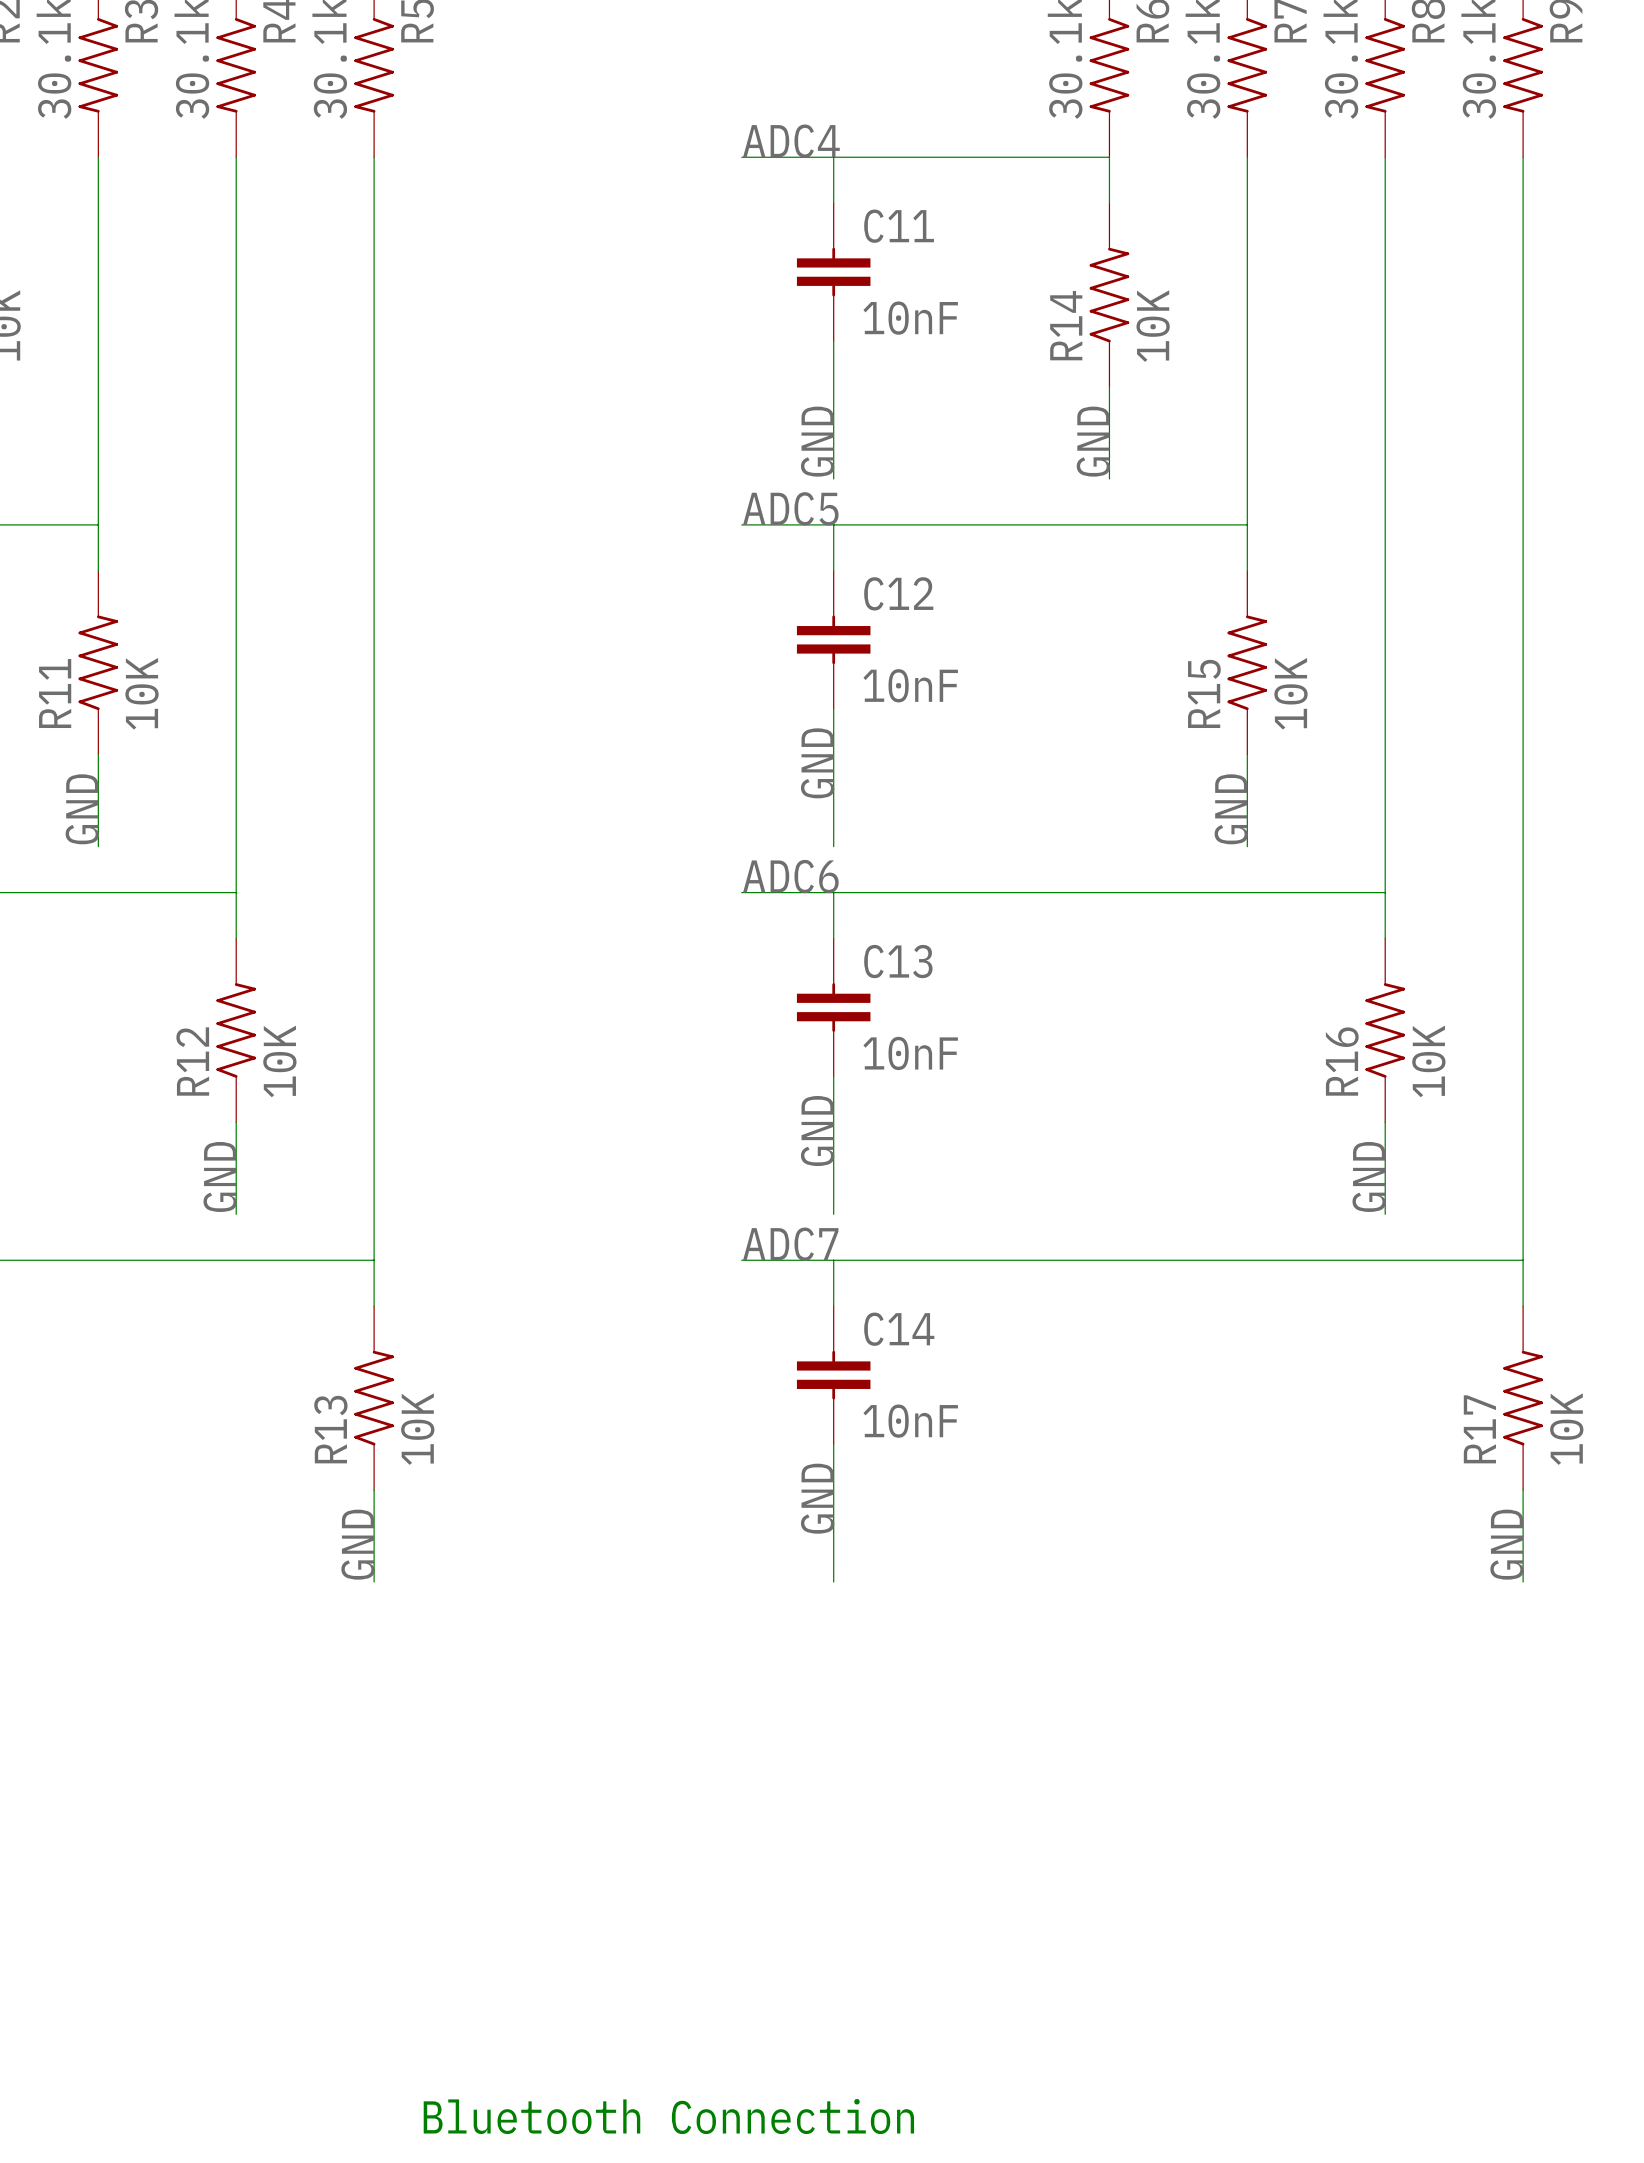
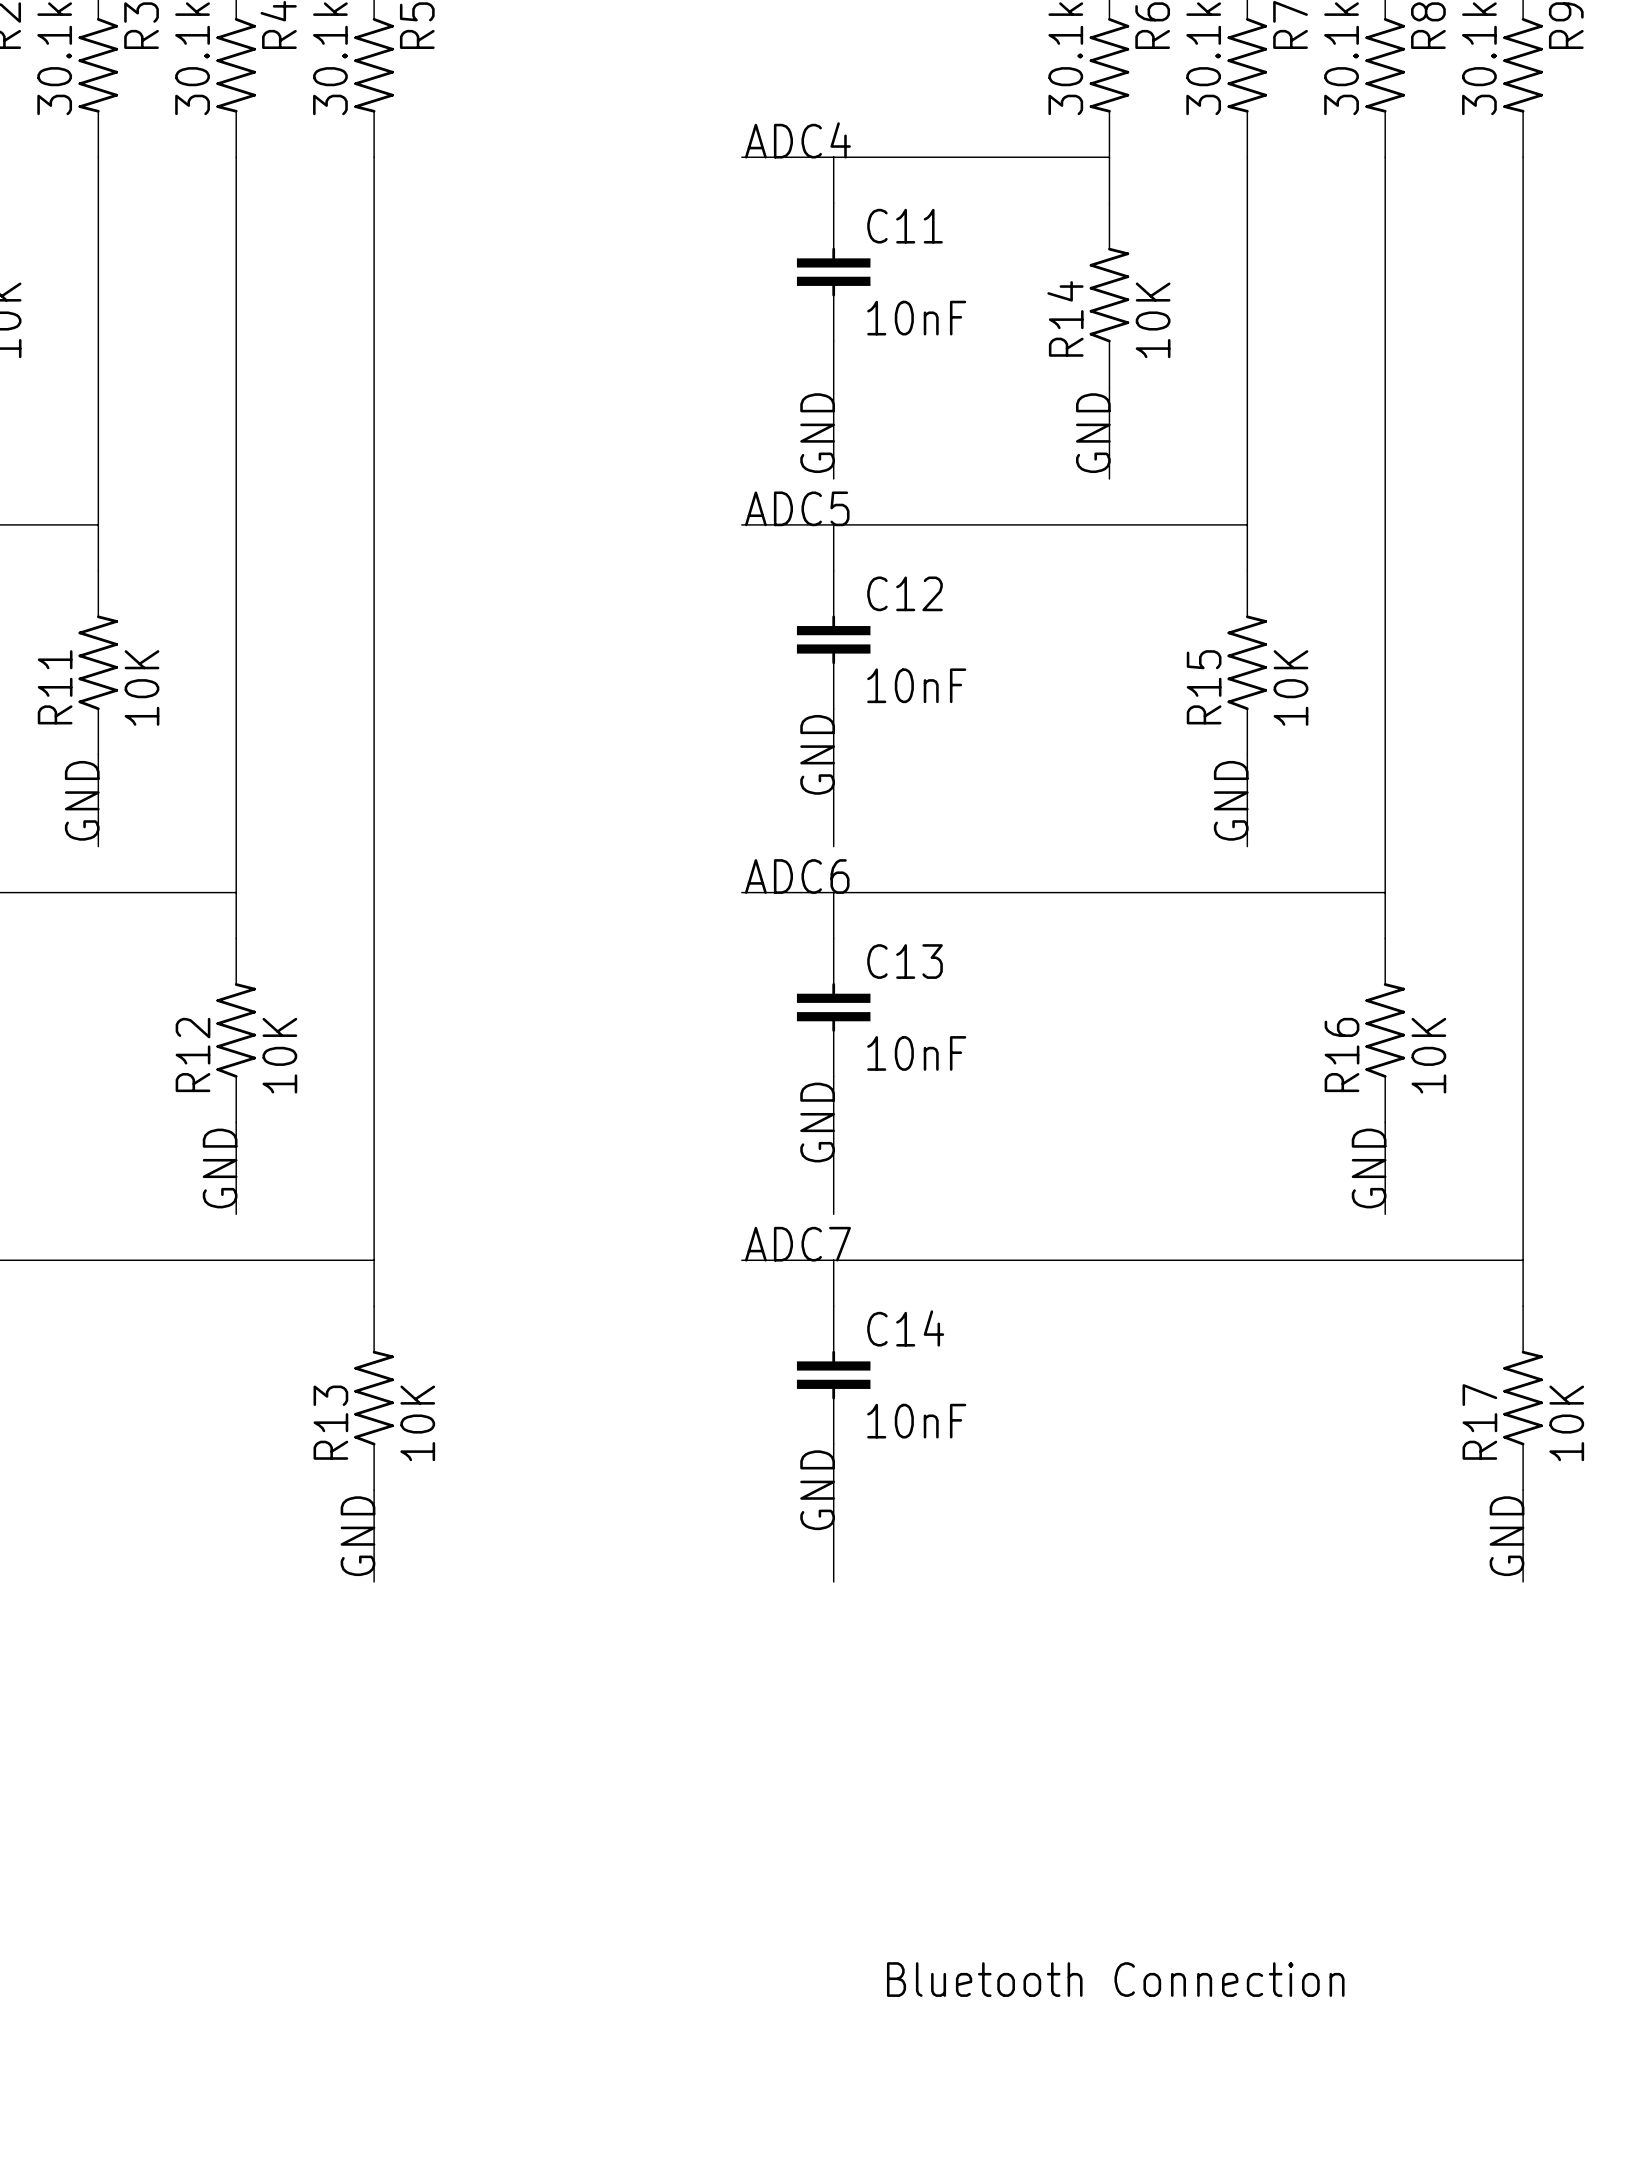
text: none -> Bluetooth Connection (1115, 1979)
text: Bluetooth Connection (668, 2116) -> none

